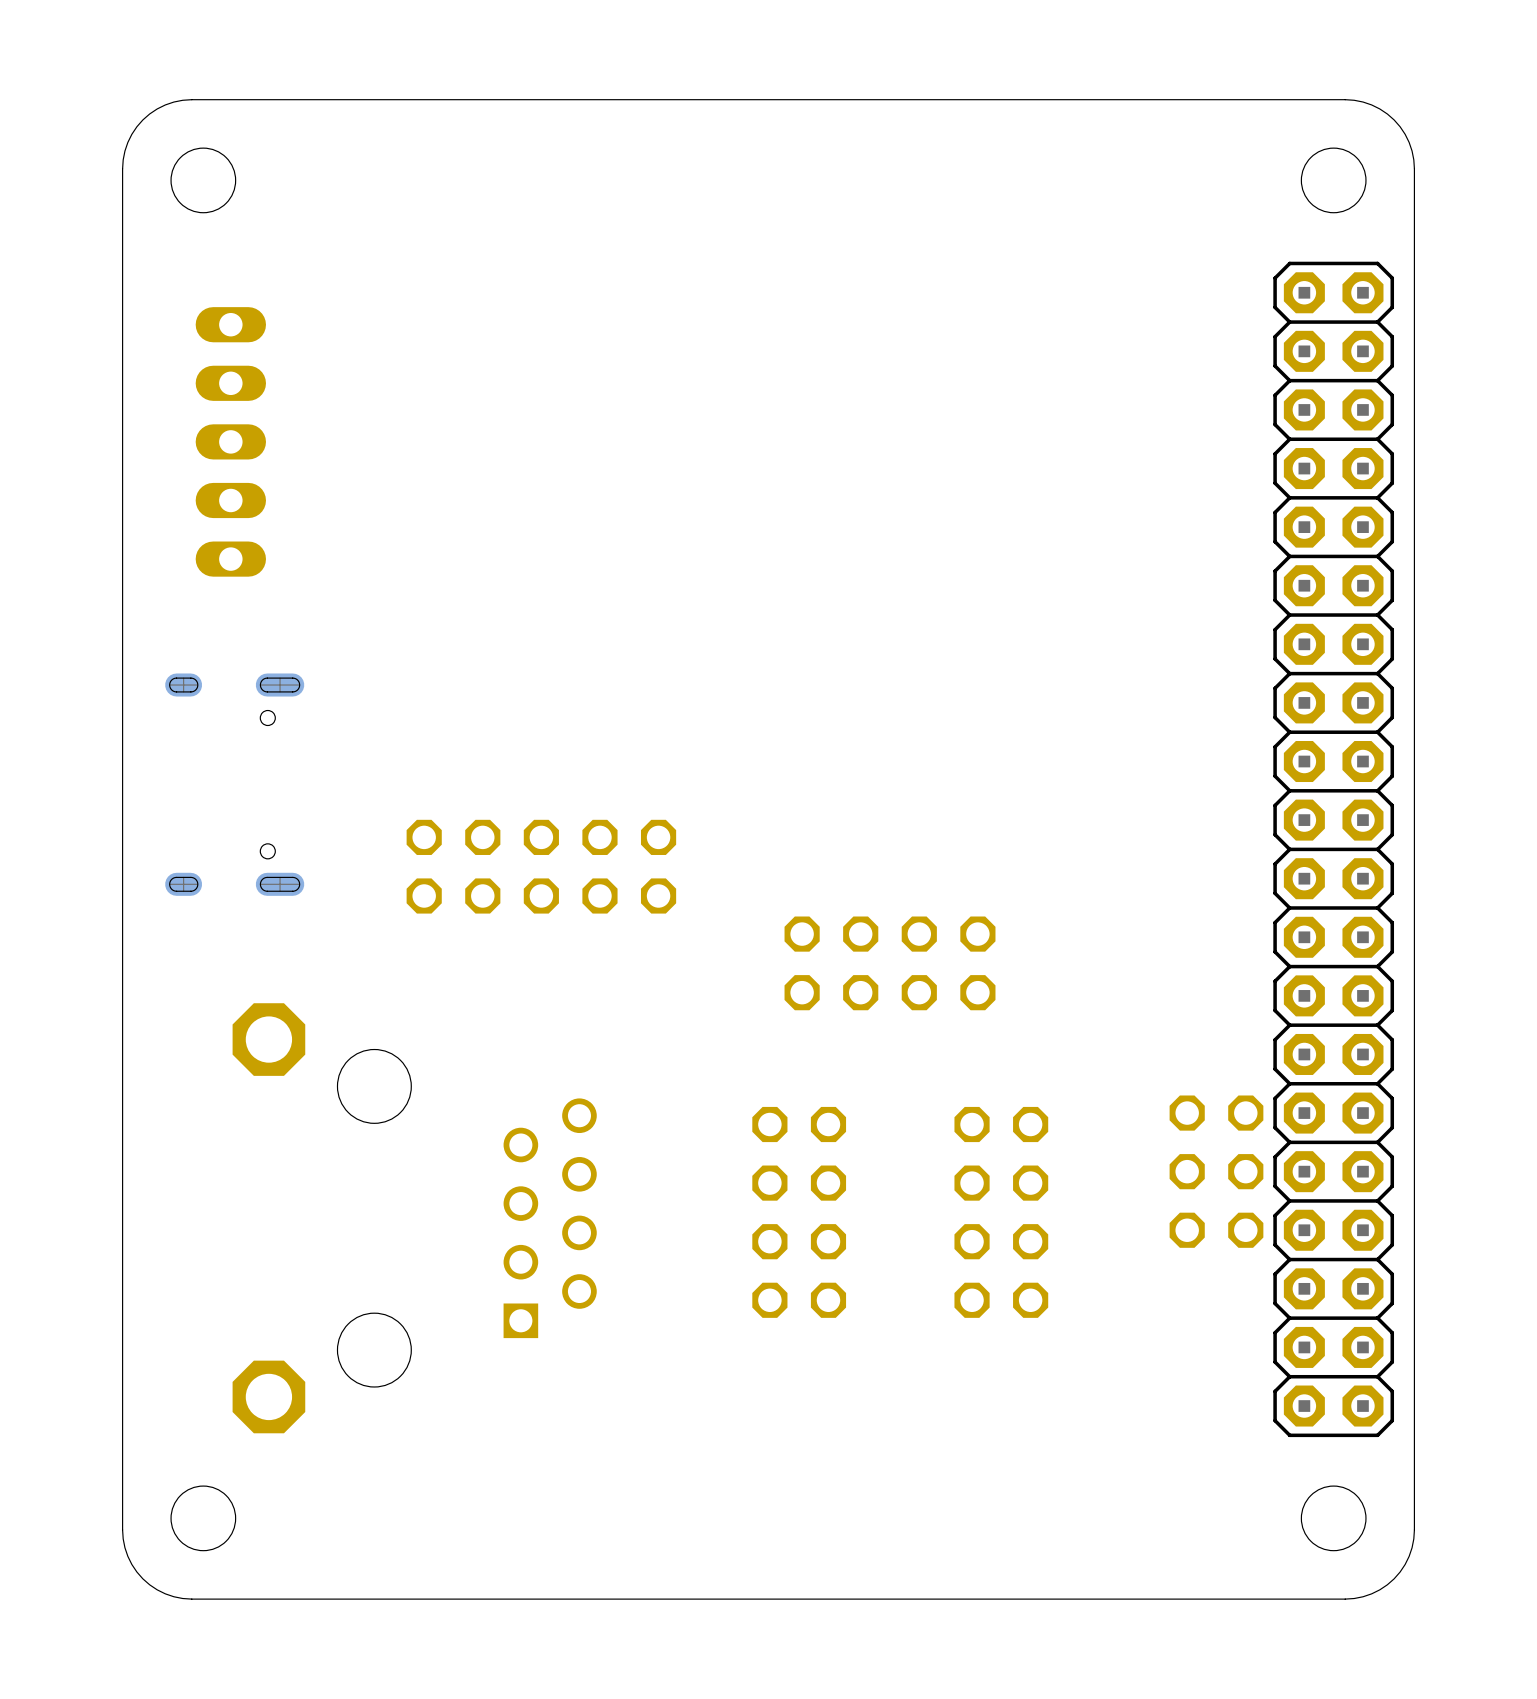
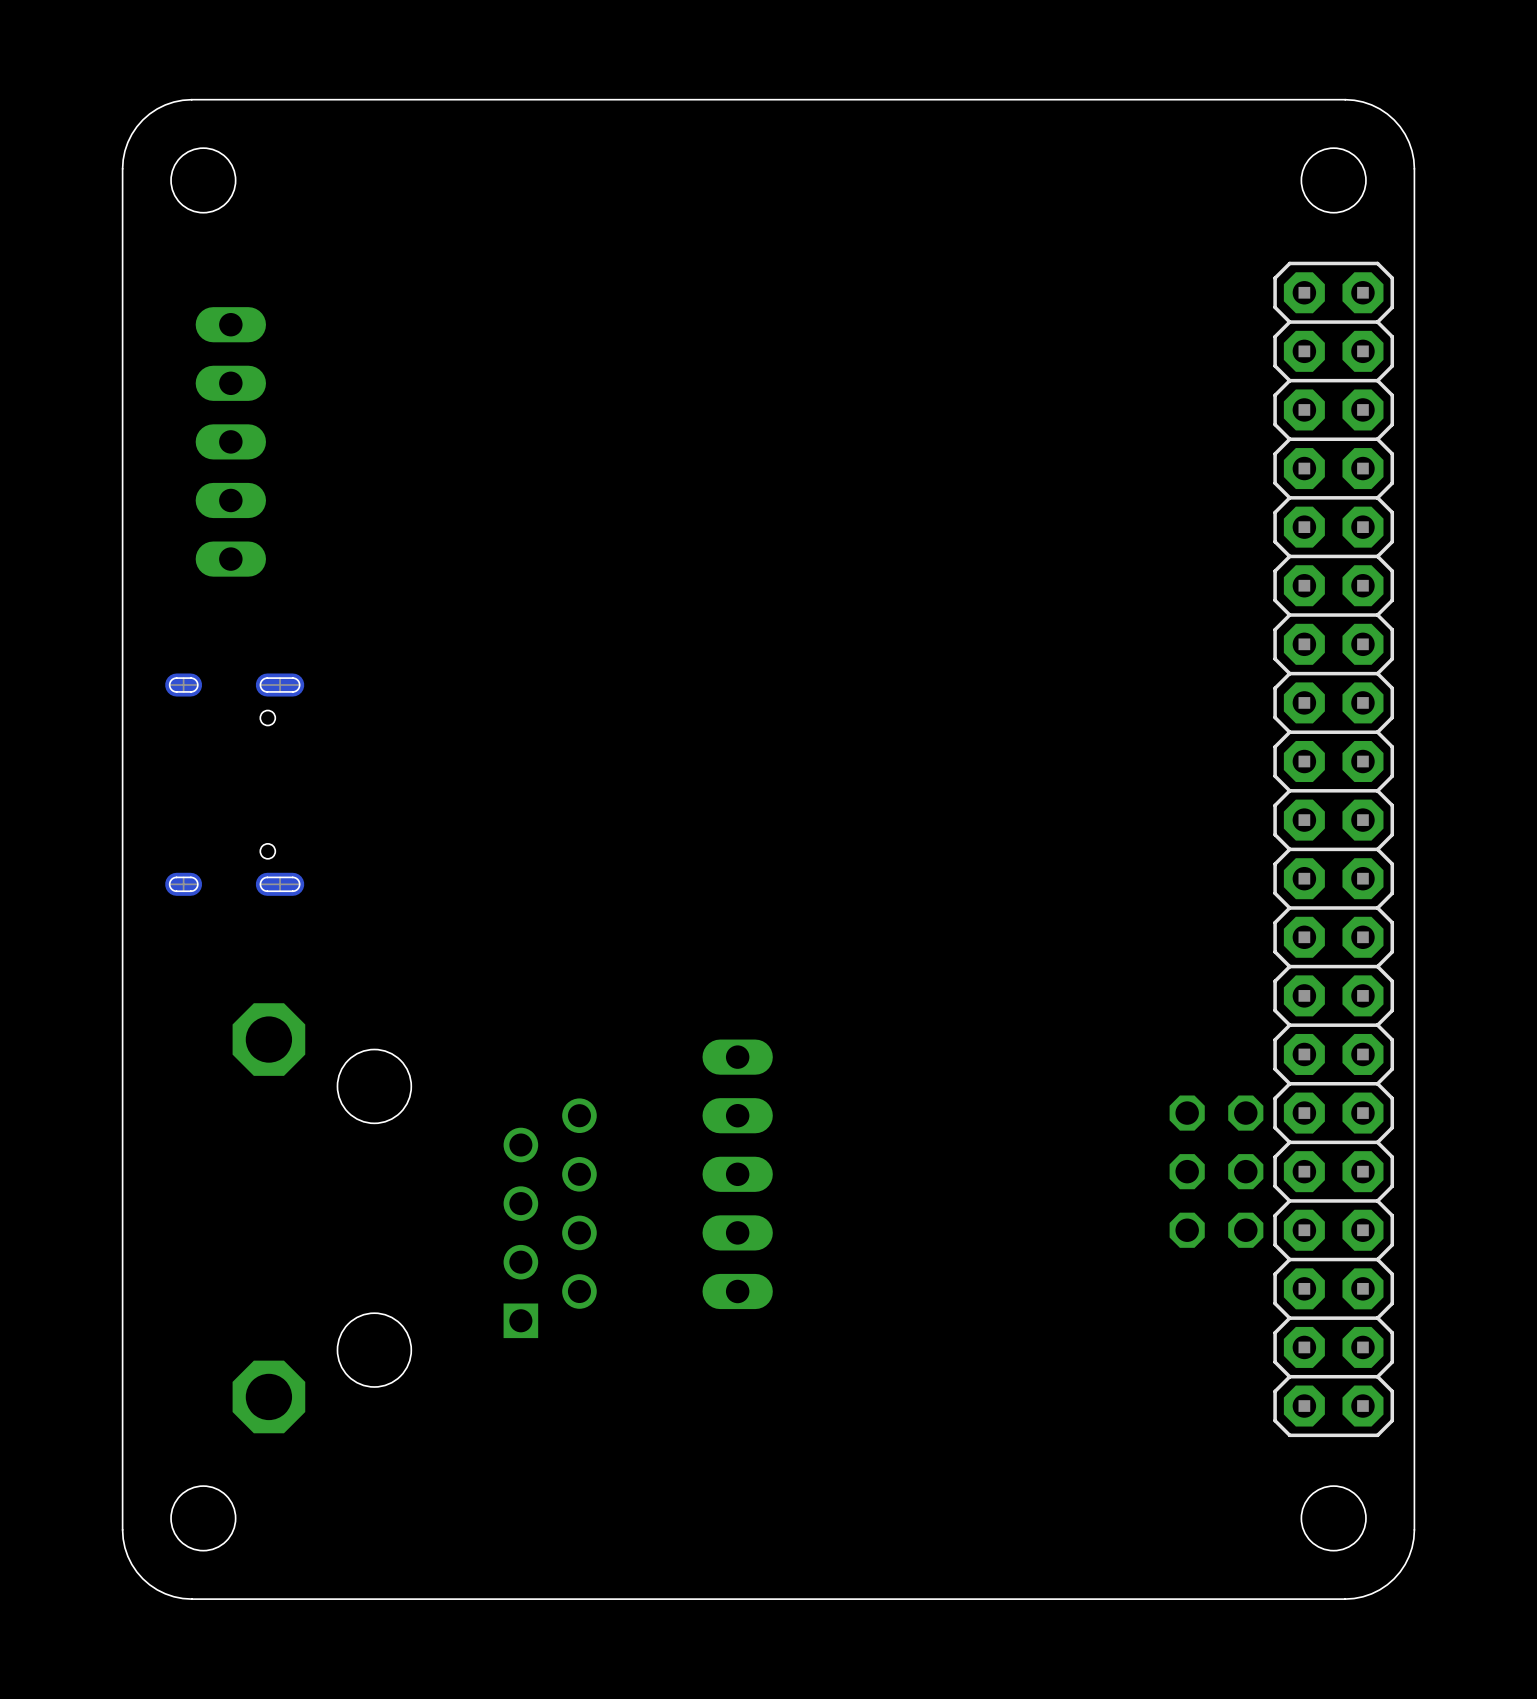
part: (541, 866) -> none
part: (890, 963) -> none
part: none -> (737, 1174)
part: (799, 1212) -> none
part: (1001, 1212) -> none

